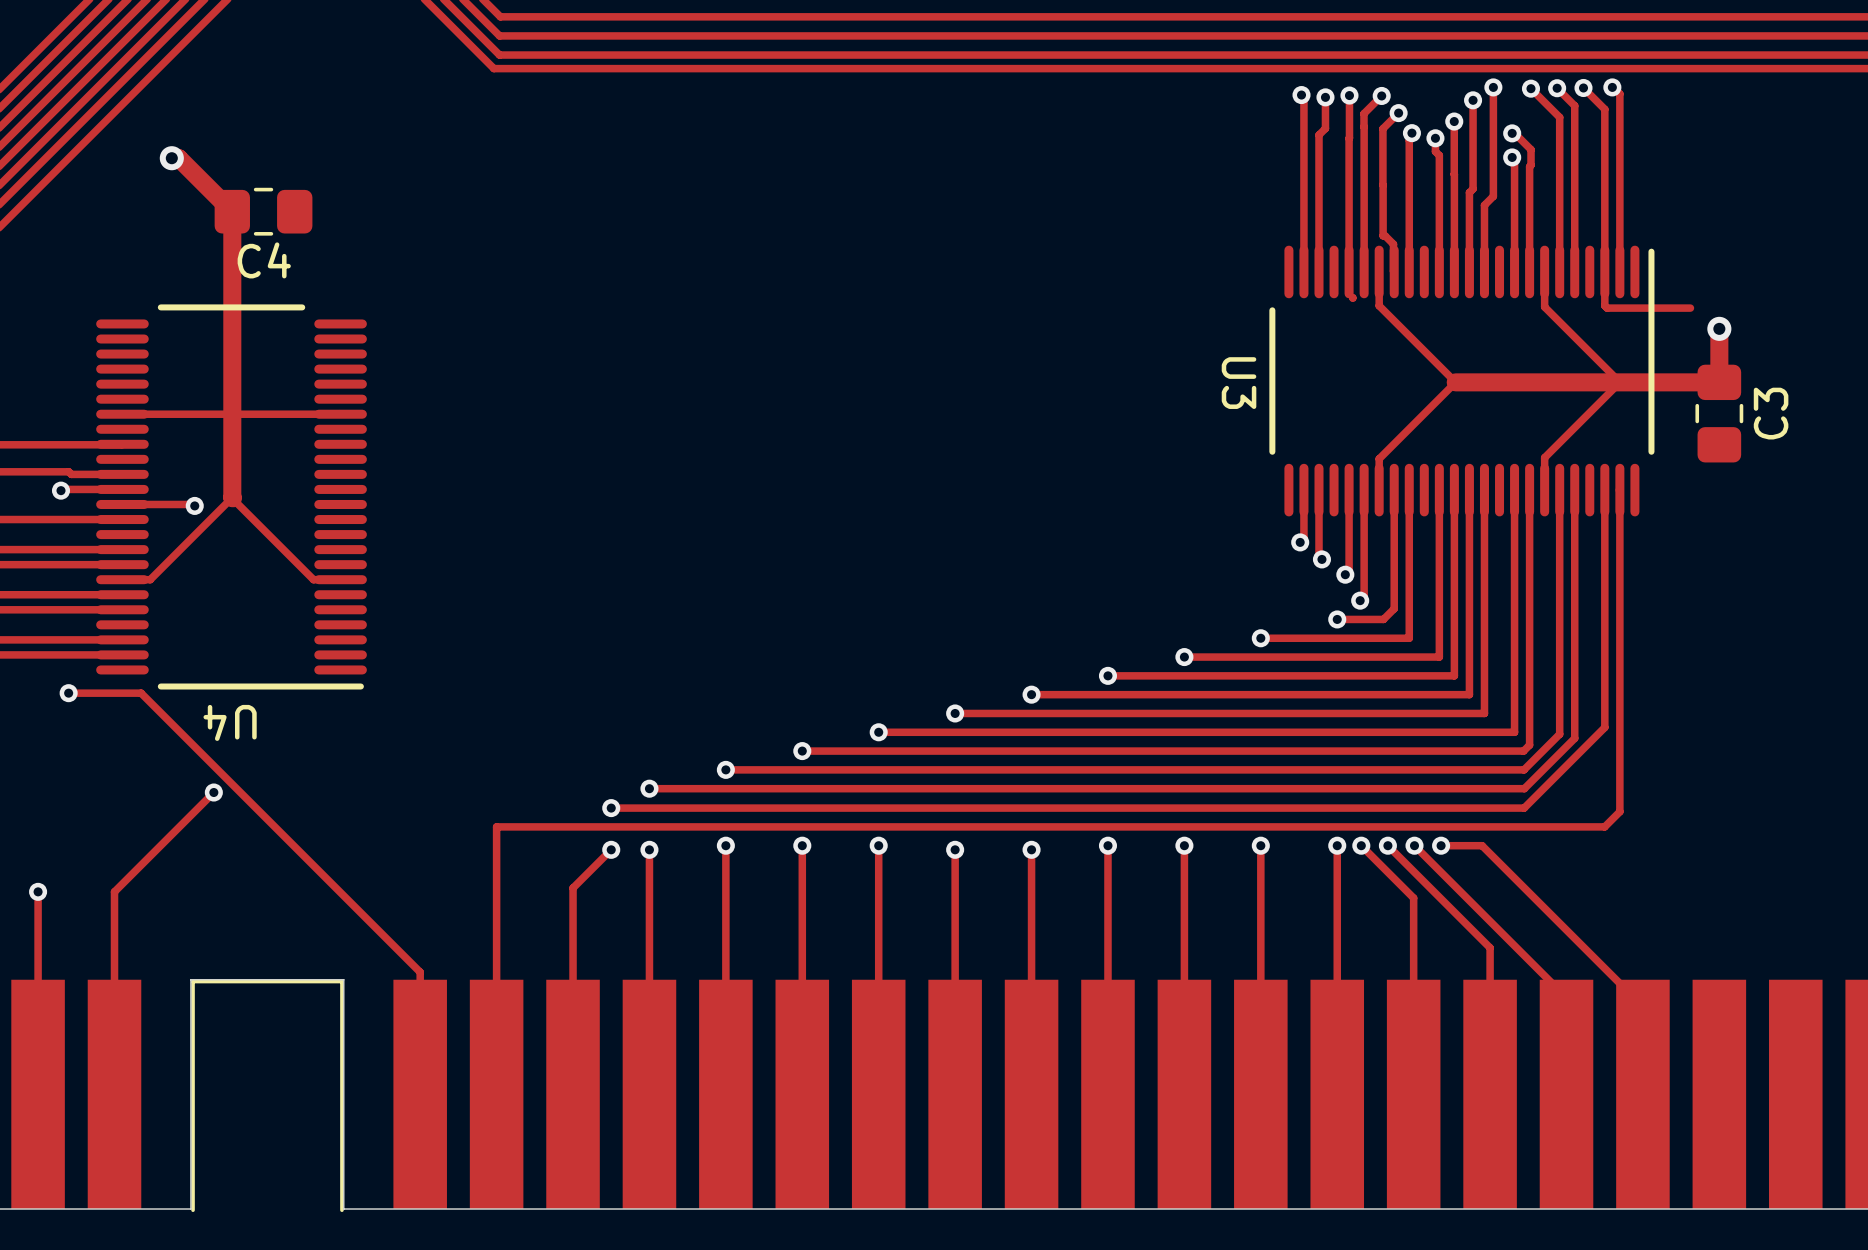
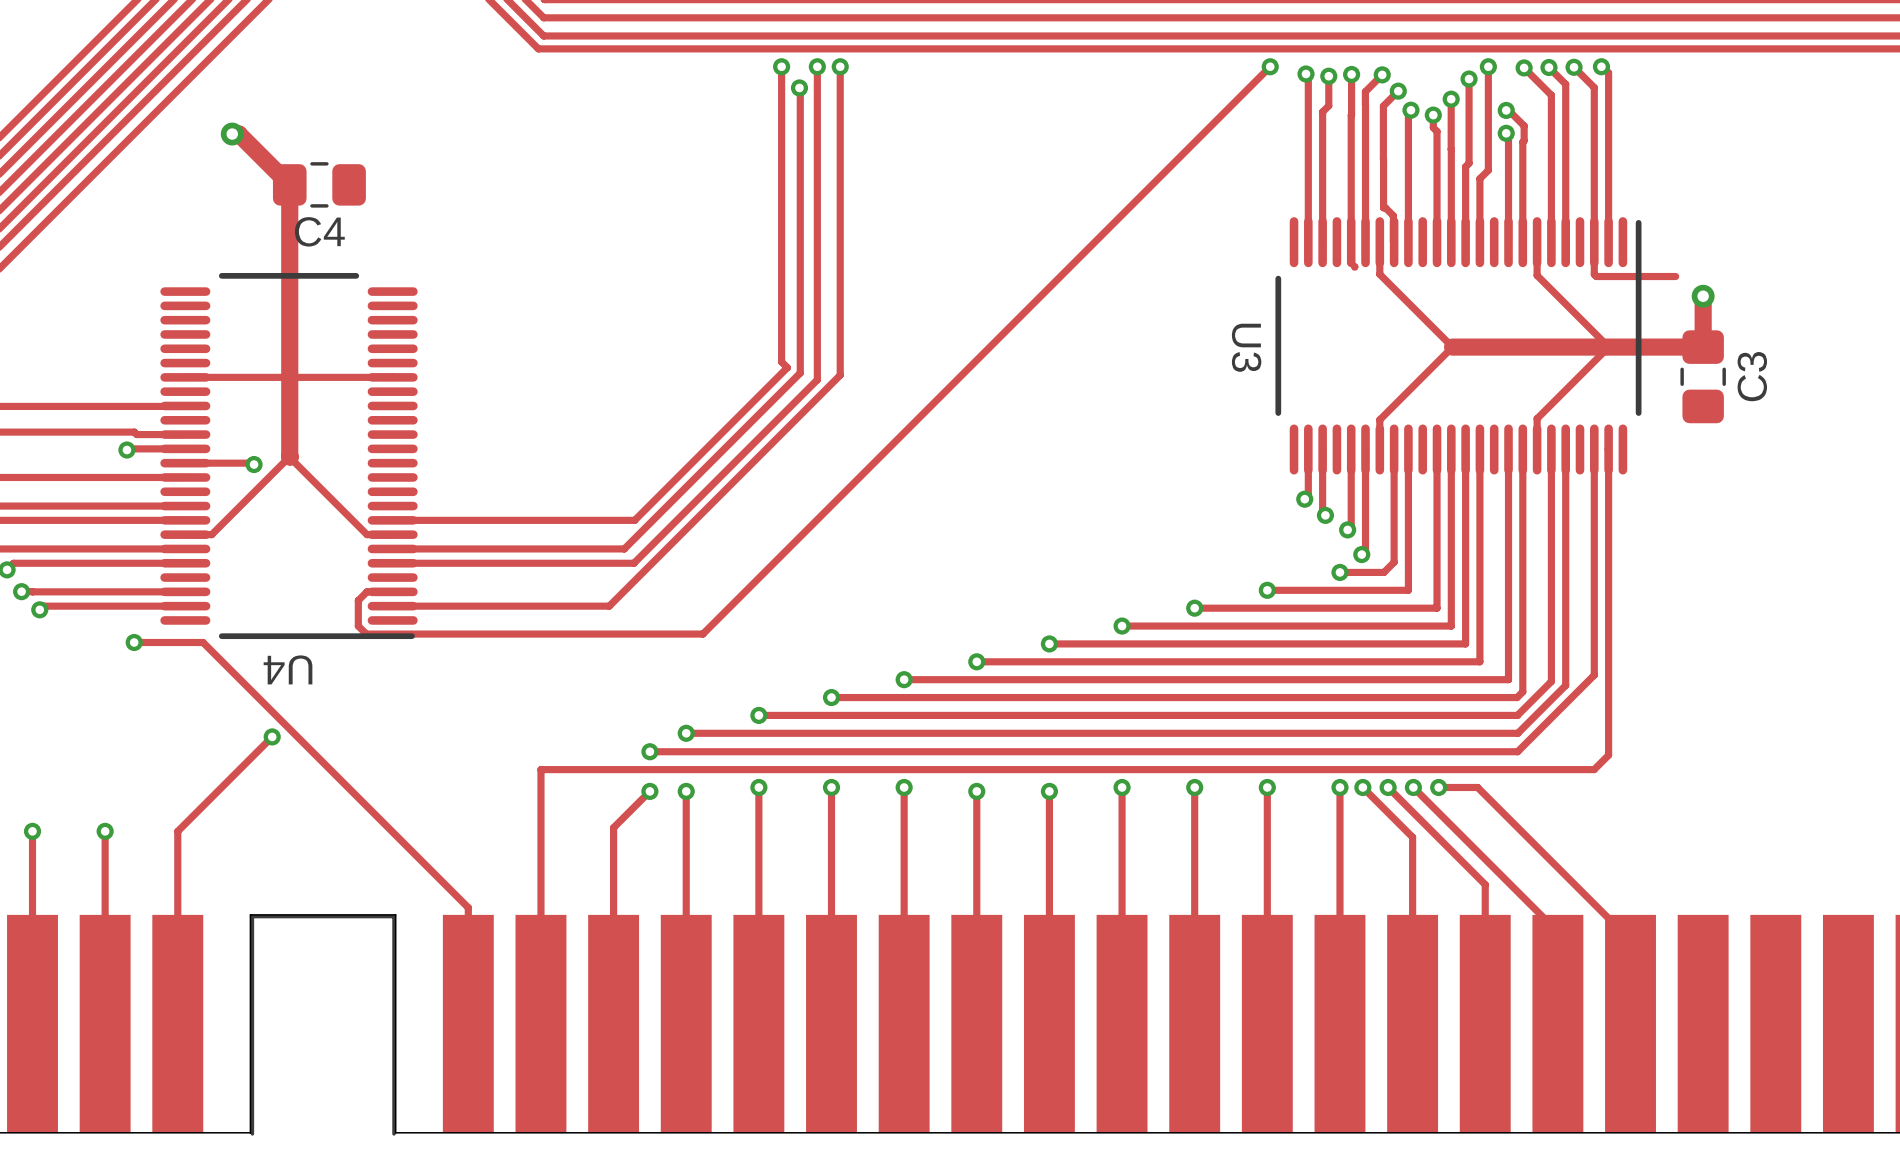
track: none -> (781, 66) (781, 361) (787, 367) (634, 520) (392, 520)
via: none -> (781, 66)
track: none -> (817, 66) (817, 379) (633, 563) (392, 563)
via: none -> (817, 66)
track: none -> (840, 66) (840, 375) (609, 606) (392, 606)
via: none -> (840, 66)
track: none -> (1270, 66) (702, 634) (366, 634) (358, 626) (358, 600) (366, 591) (392, 591)
via: none -> (1270, 66)
track: none -> (799, 87) (800, 373) (624, 548) (392, 548)
via: none -> (799, 87)

